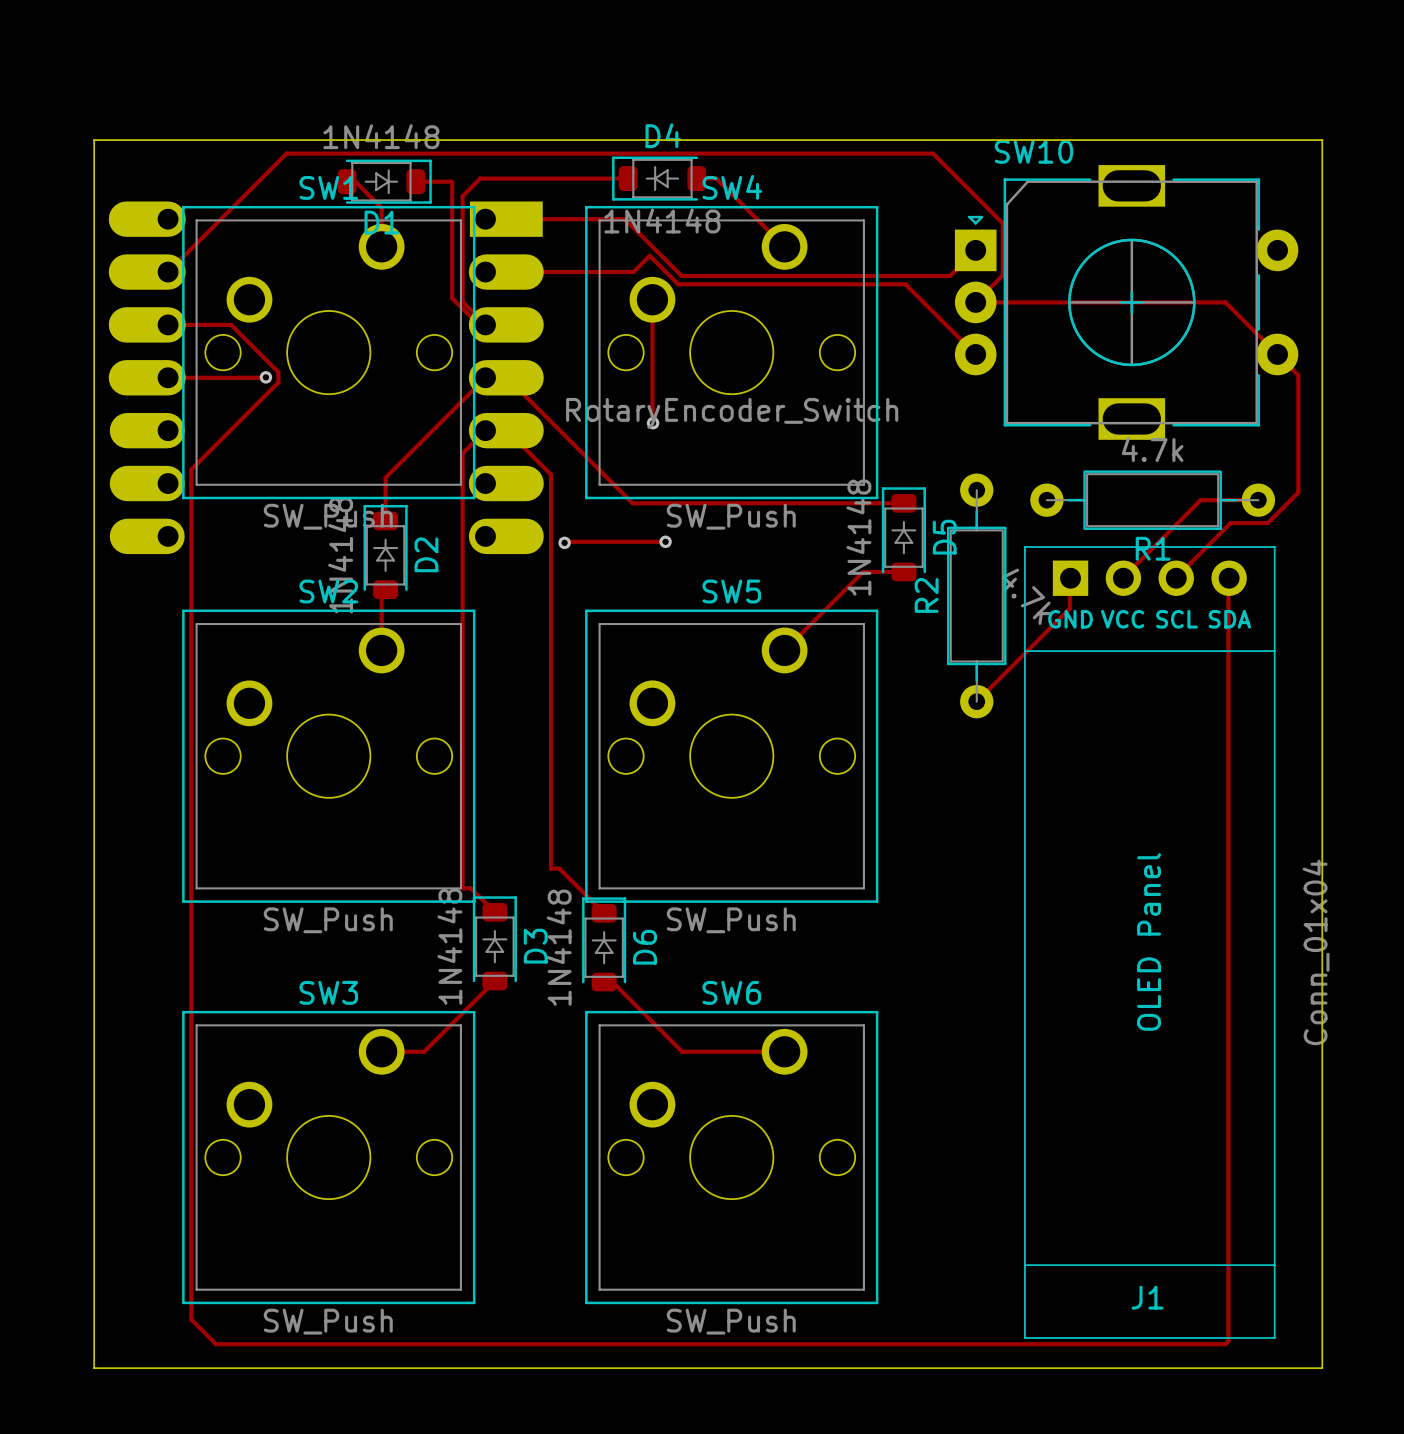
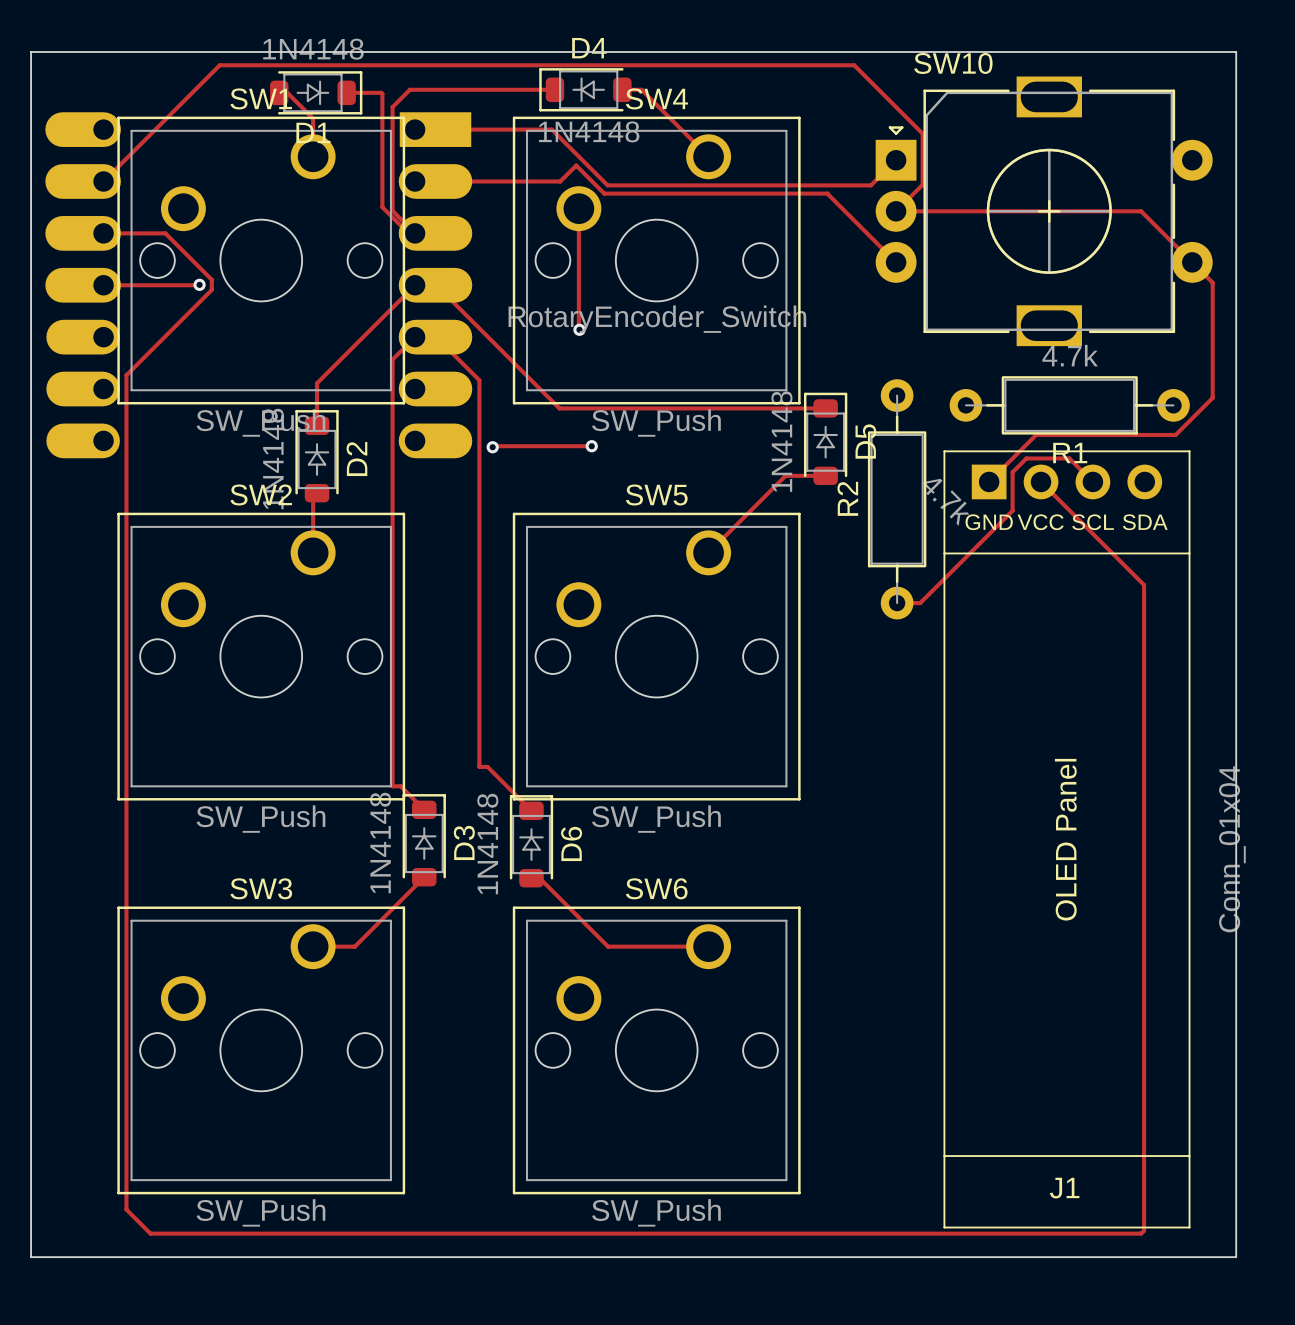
track: (1258, 500) (1200, 500) (1122, 578) -> none
track: (1267, 523) (1230, 523) (1175, 578) -> (1182, 427) (1175, 434) (1036, 434) (989, 481)
track: (1069, 578) (1069, 608) (976, 701) -> (1092, 481) (1069, 458) (1026, 458) (1012, 472) (1012, 510) (920, 603) (897, 603)
track: (1228, 578) (1228, 683) -> (1041, 481) (1144, 585)

